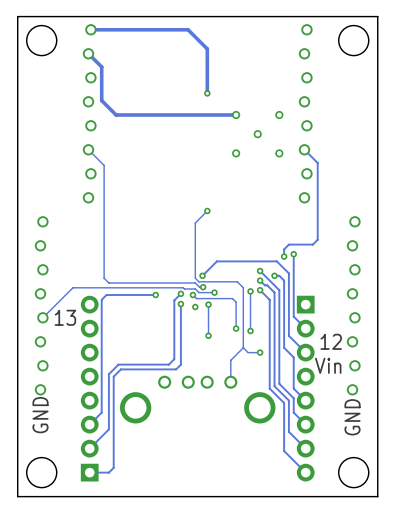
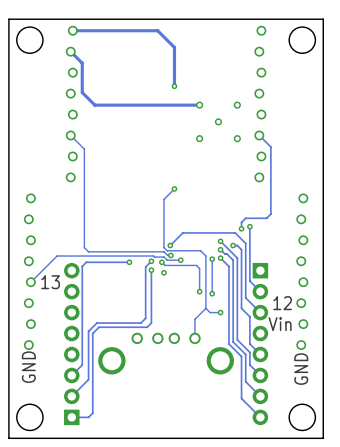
track: (208, 304) (208, 335) -> none
via: (208, 304) -> none
via: (208, 335) -> none

